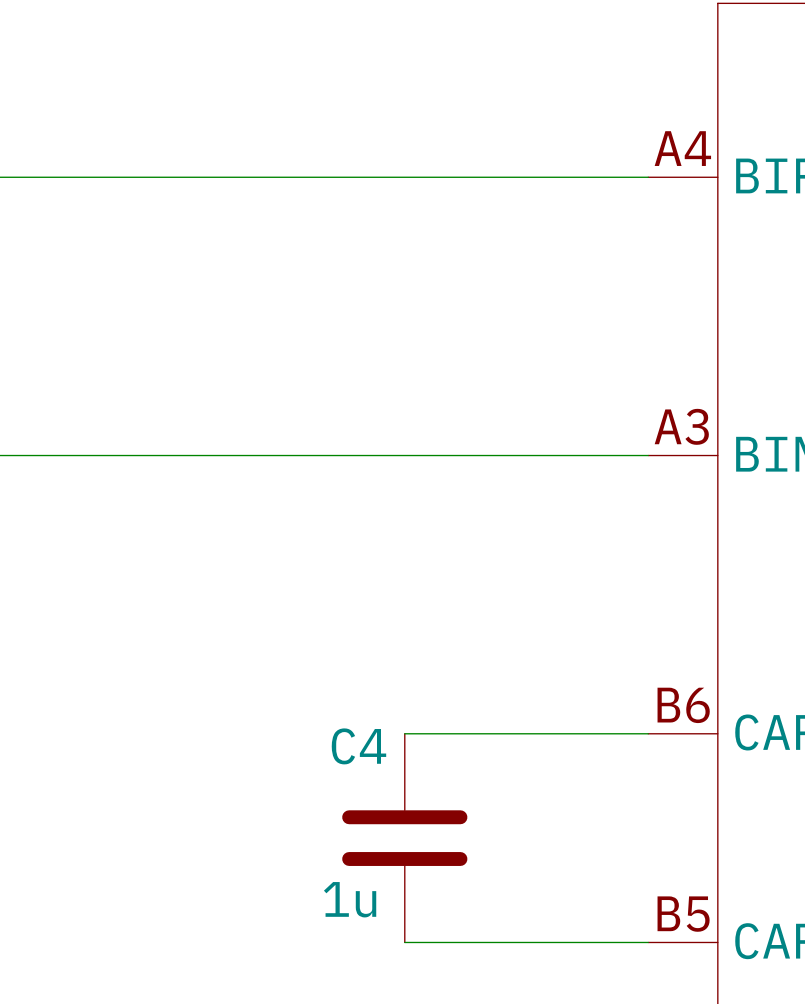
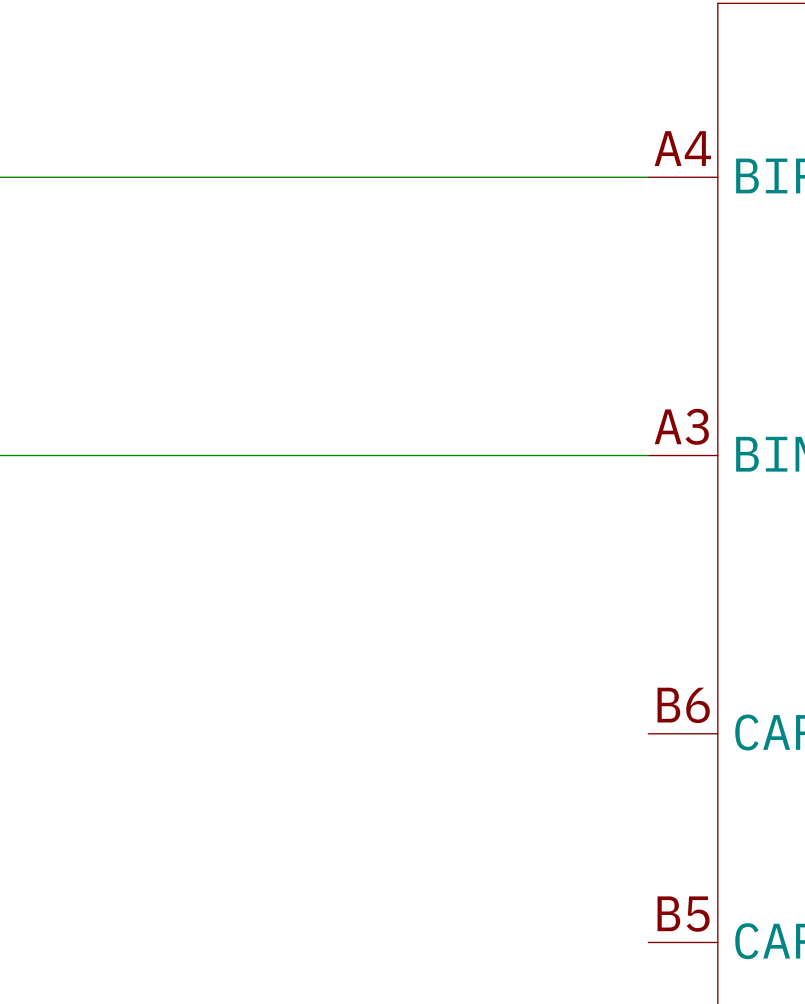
wire: (404, 733) (648, 733) -> none
C4: 1u (404, 838) -> none
wire: (404, 942) (648, 942) -> none

